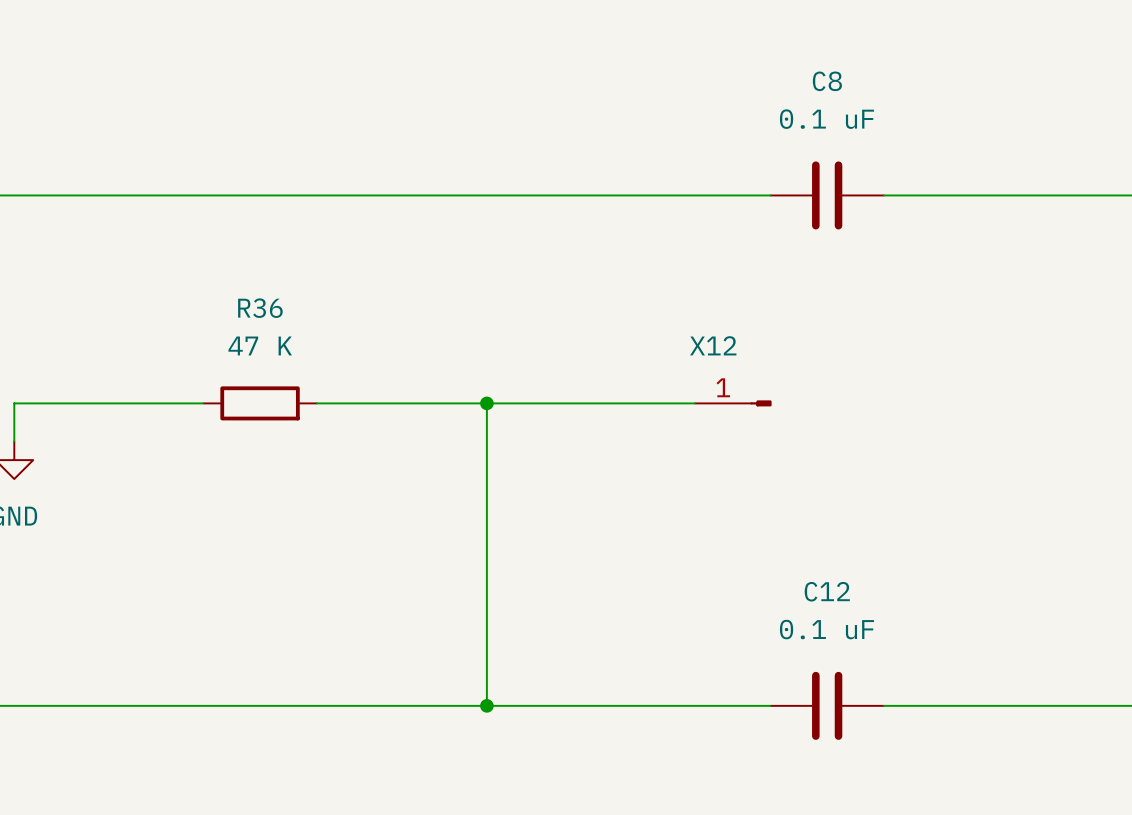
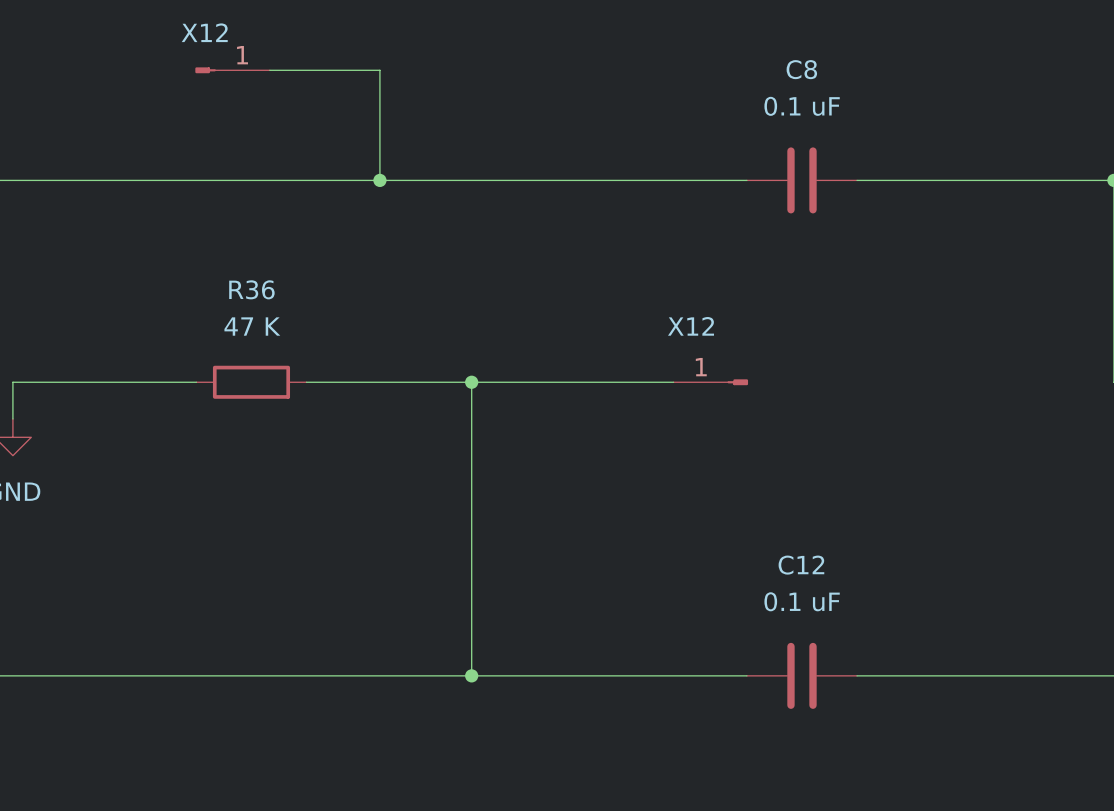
X12: none -> (232, 70)
wire: none -> (269, 70) (379, 70) (379, 180)
junction: none -> (379, 180)

